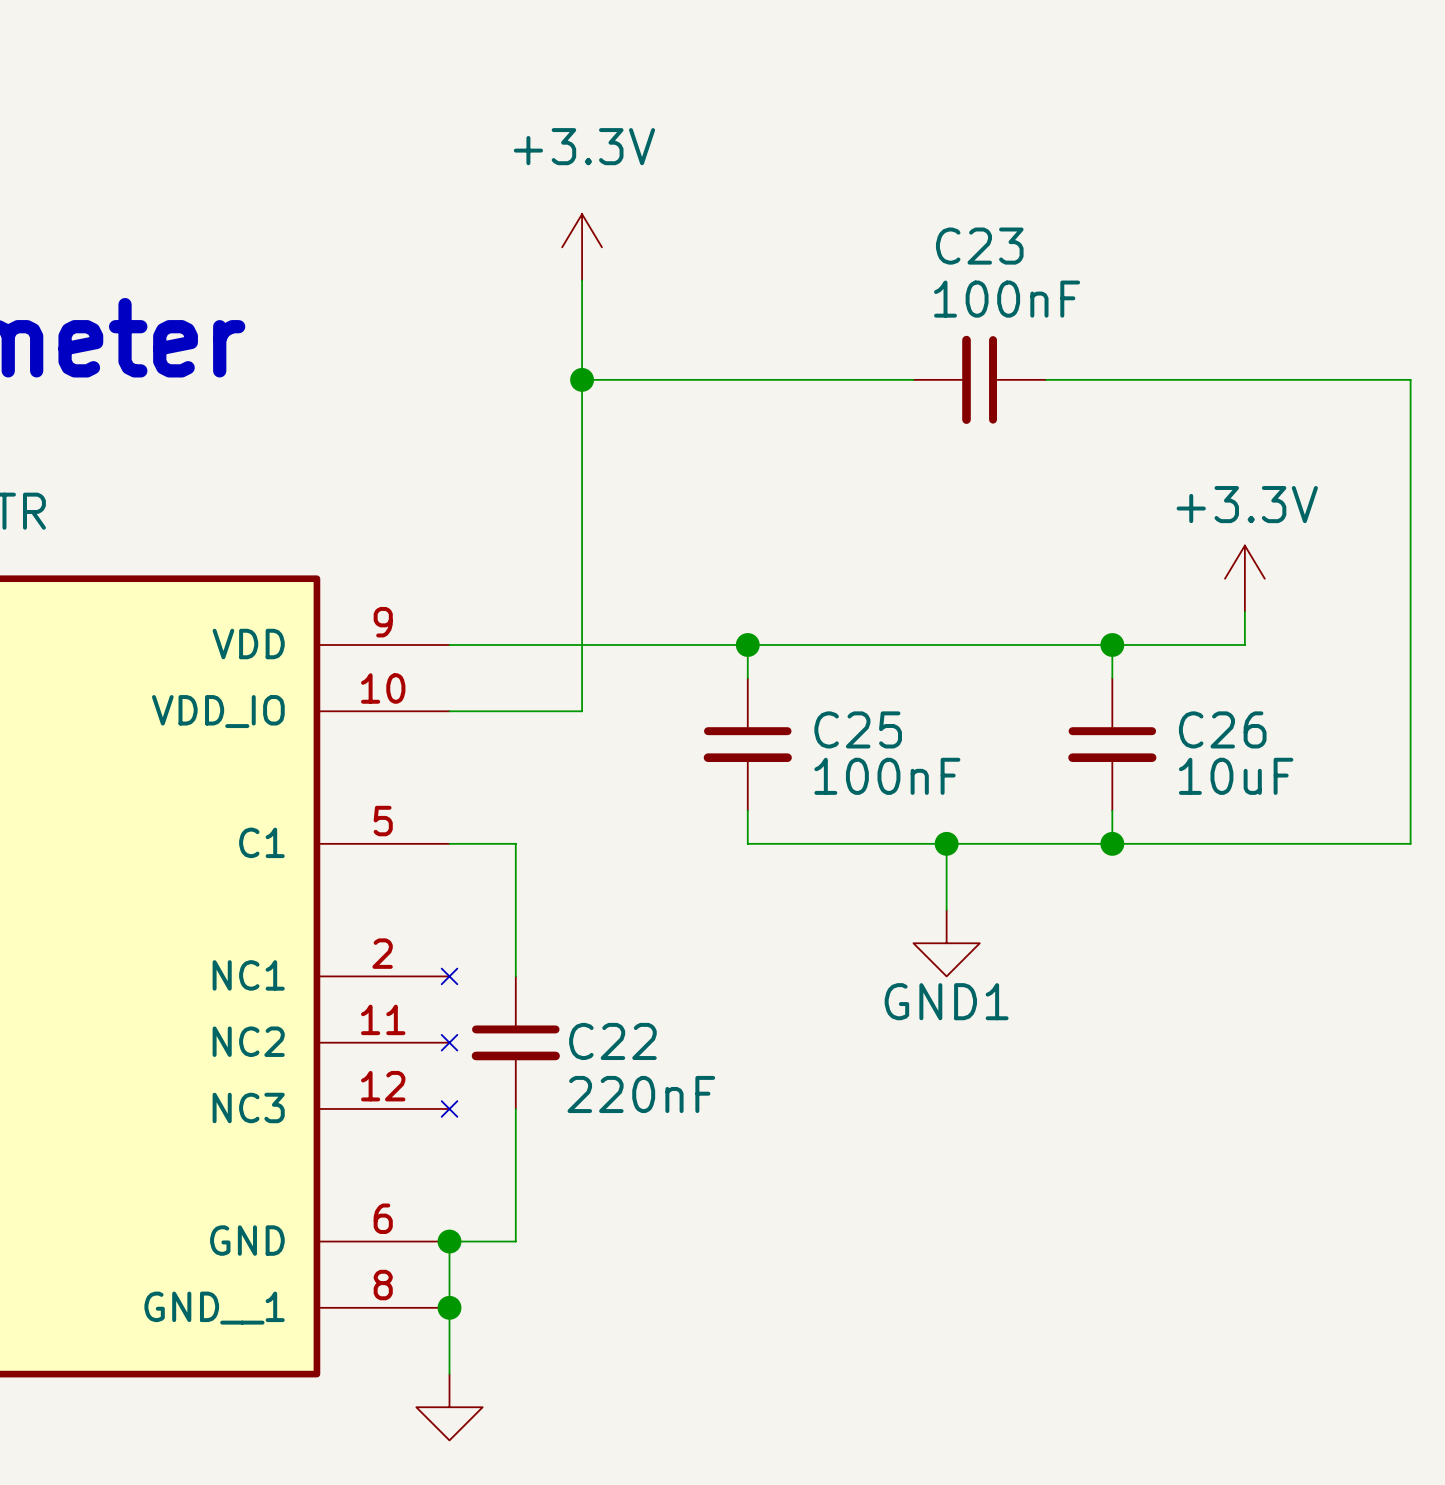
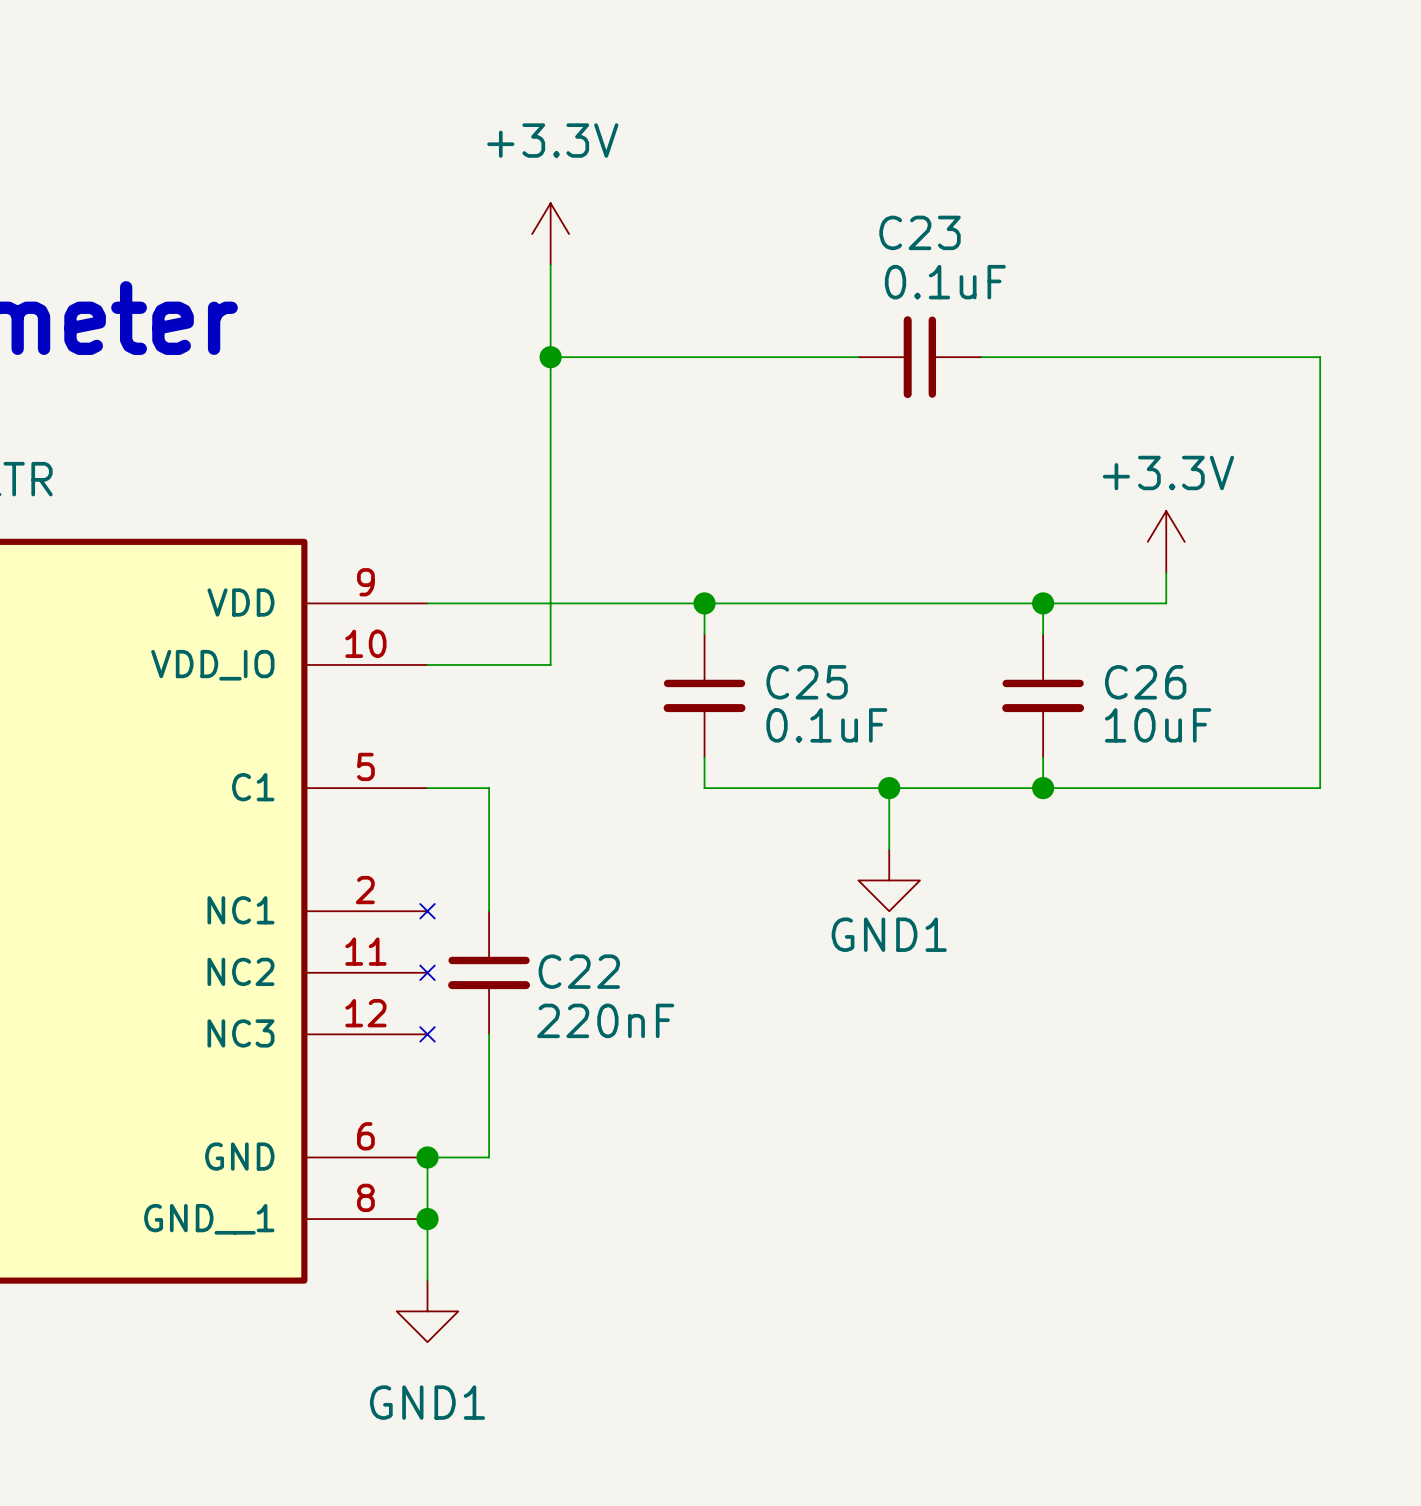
C23 value: 100nF (1007, 299) -> 0.1uF (945, 282)
C25 value: 100nF (887, 776) -> 0.1uF (826, 725)

